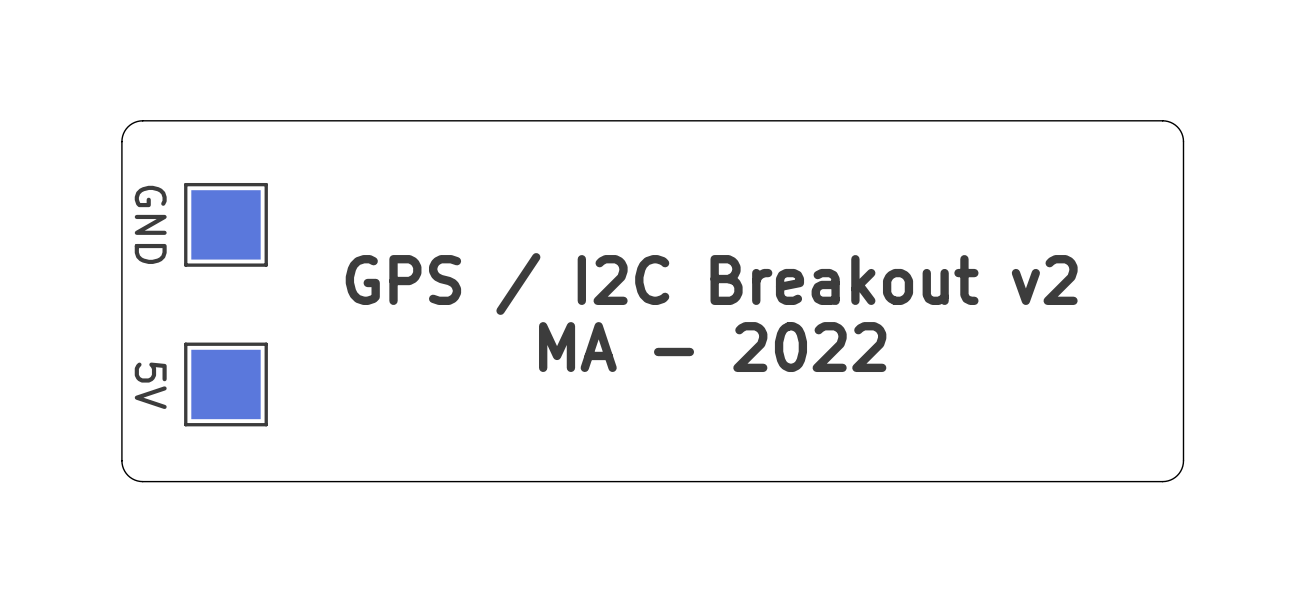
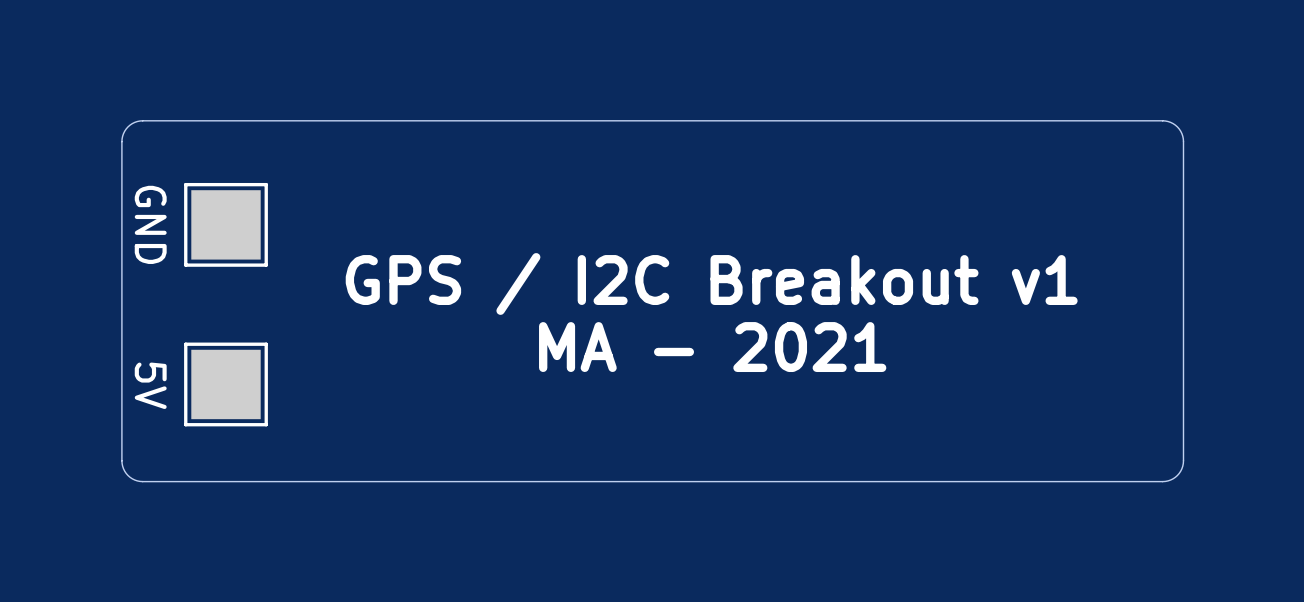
text: GPS / I2C Breakout v2 (711, 283) -> GPS / I2C Breakout v1 (711, 283)
text: MA - 2022 (712, 347) -> MA - 2021 (712, 347)

